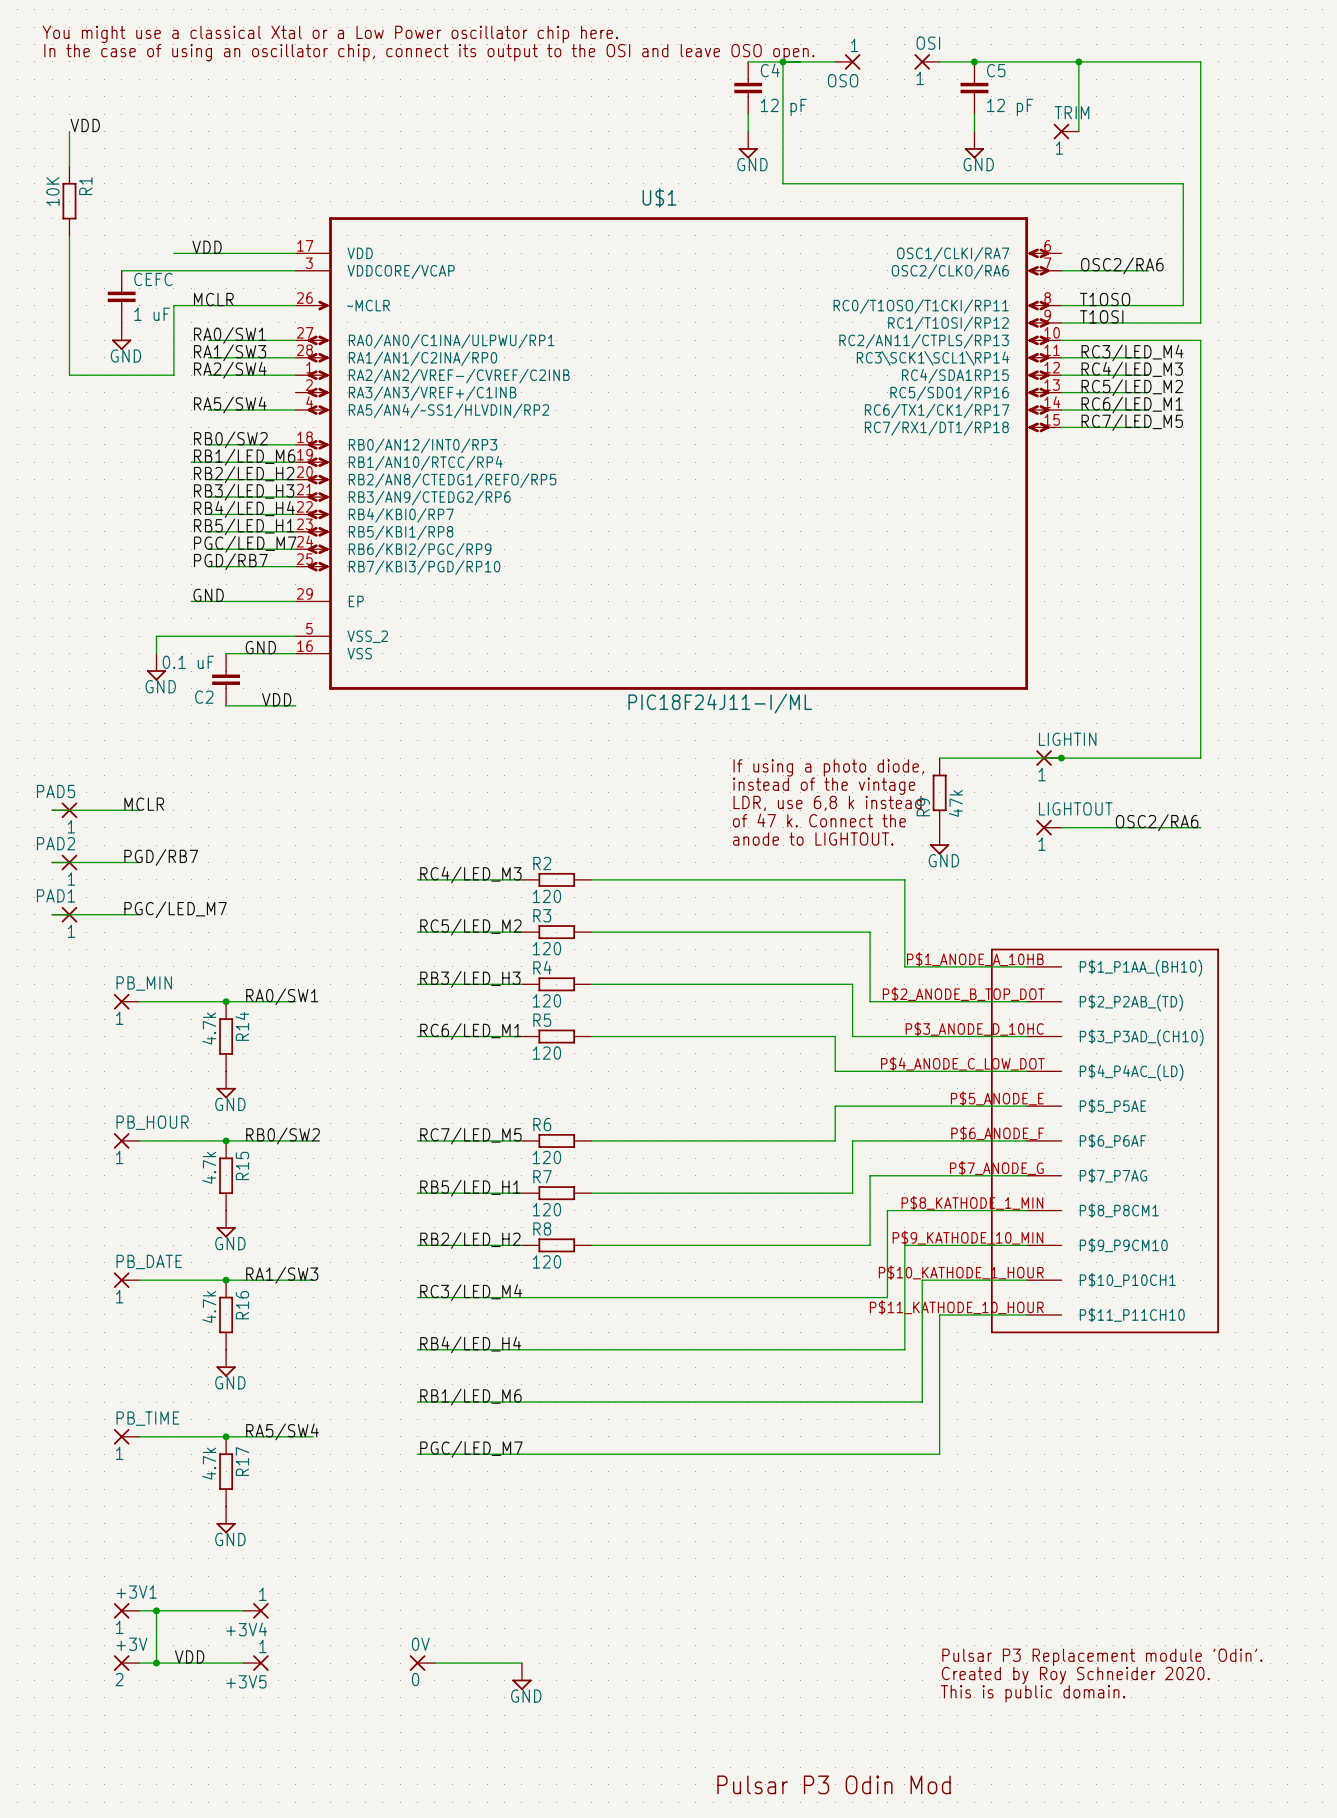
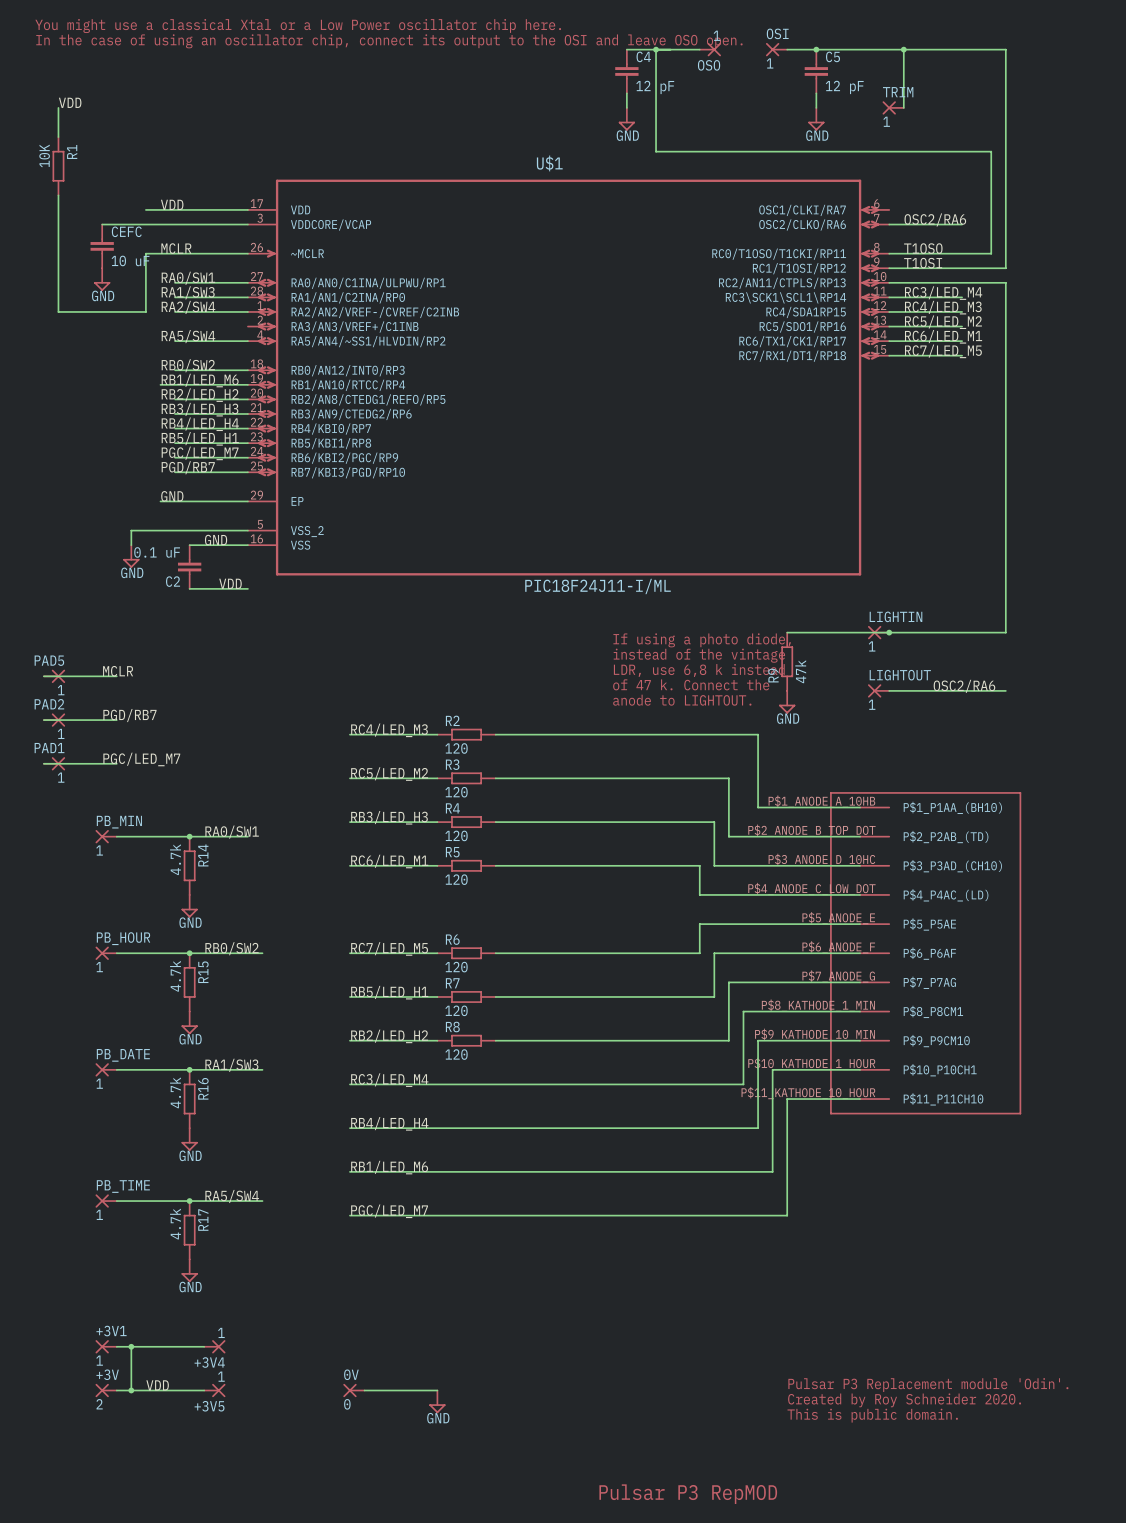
CEFC value: 1 uF (152, 314) -> 10 uF (130, 260)
text: Pulsar P3 Odin Mod (834, 1784) -> Pulsar P3 RepMOD (688, 1494)

